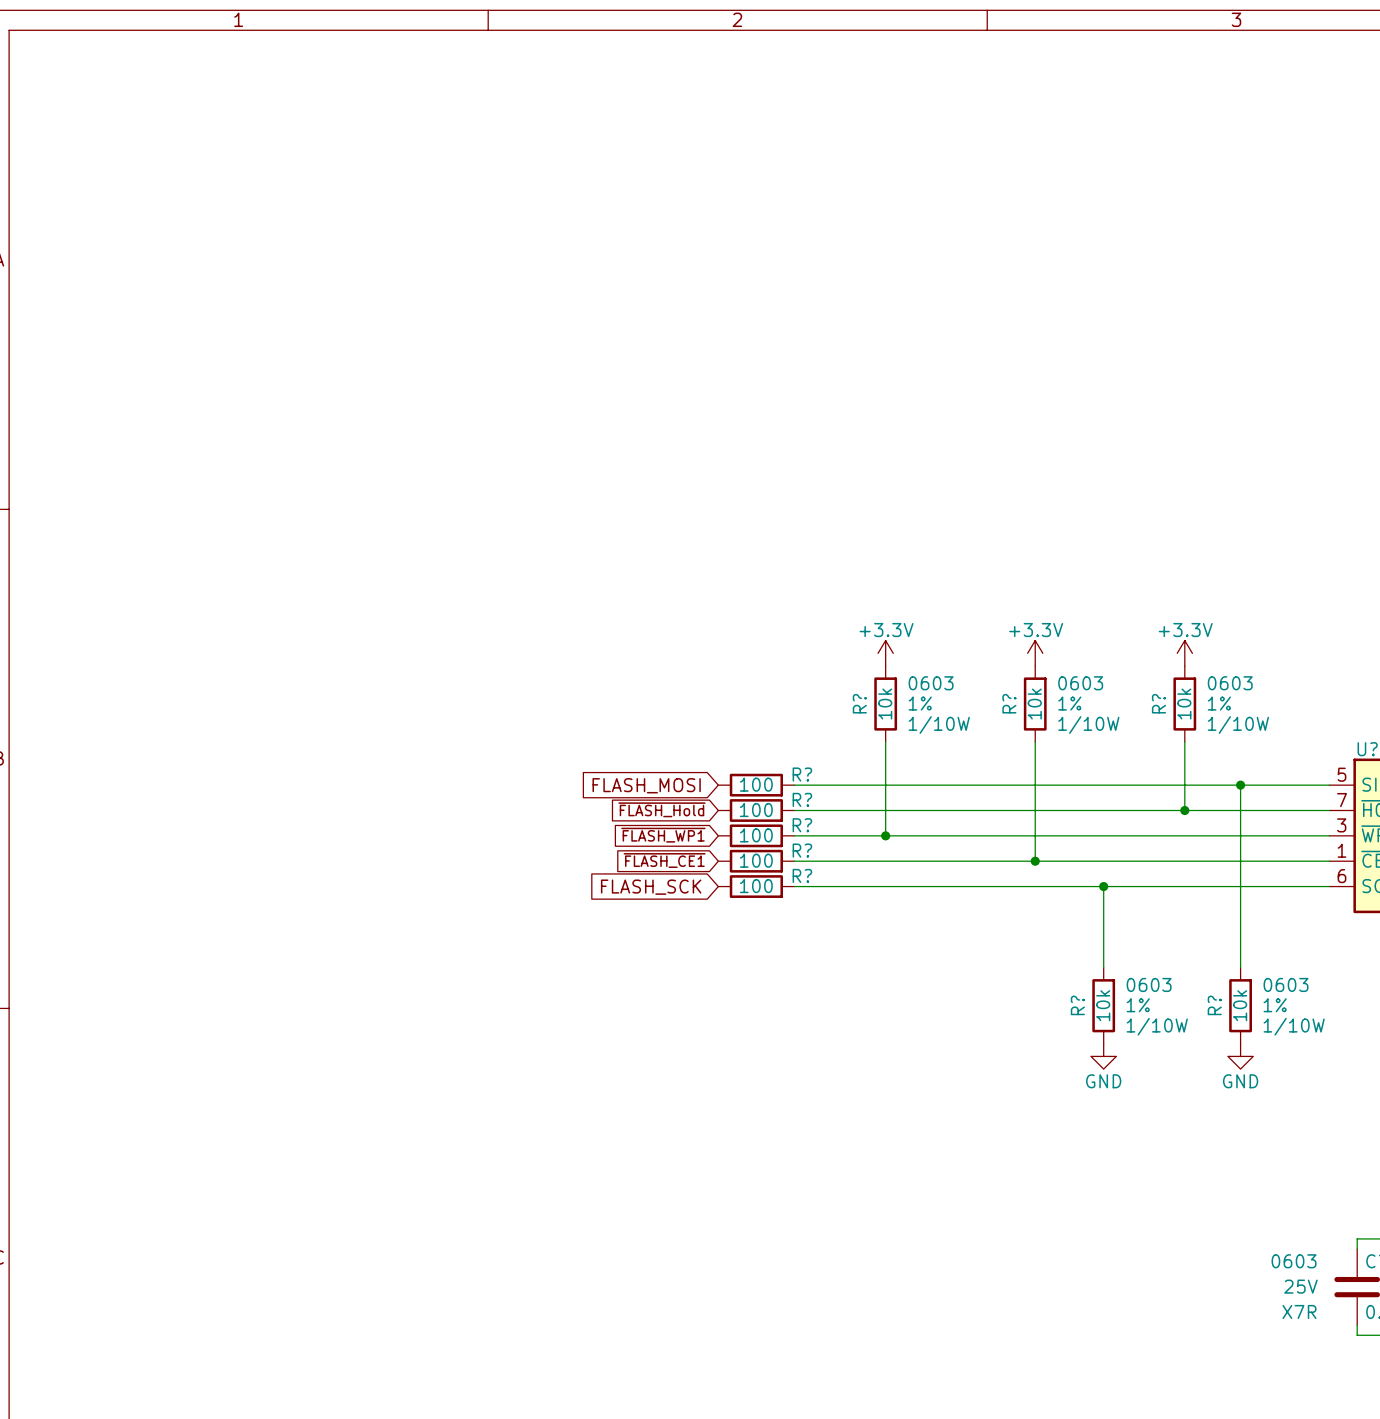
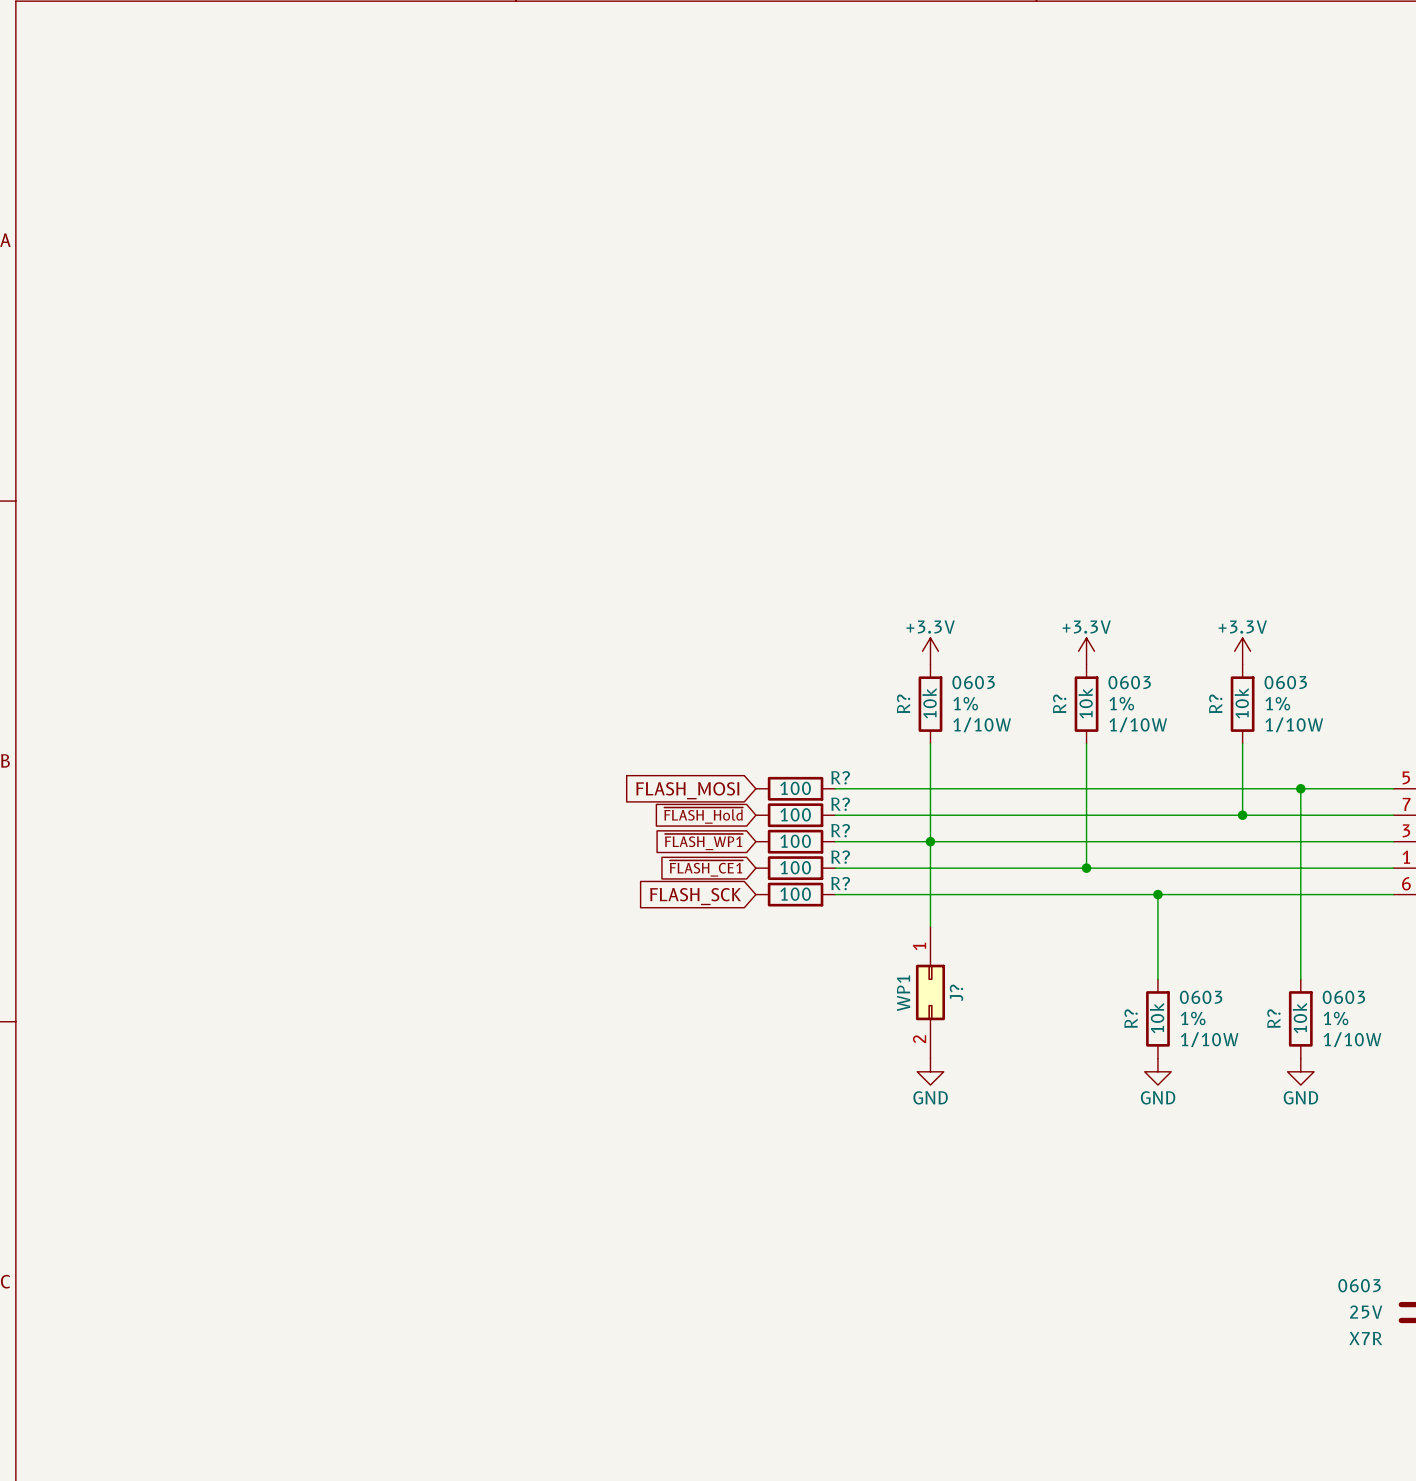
wire: none -> (930, 841) (930, 926)
J?: none -> WP1 (930, 992)
power symbol: none -> GND (930, 1071)

